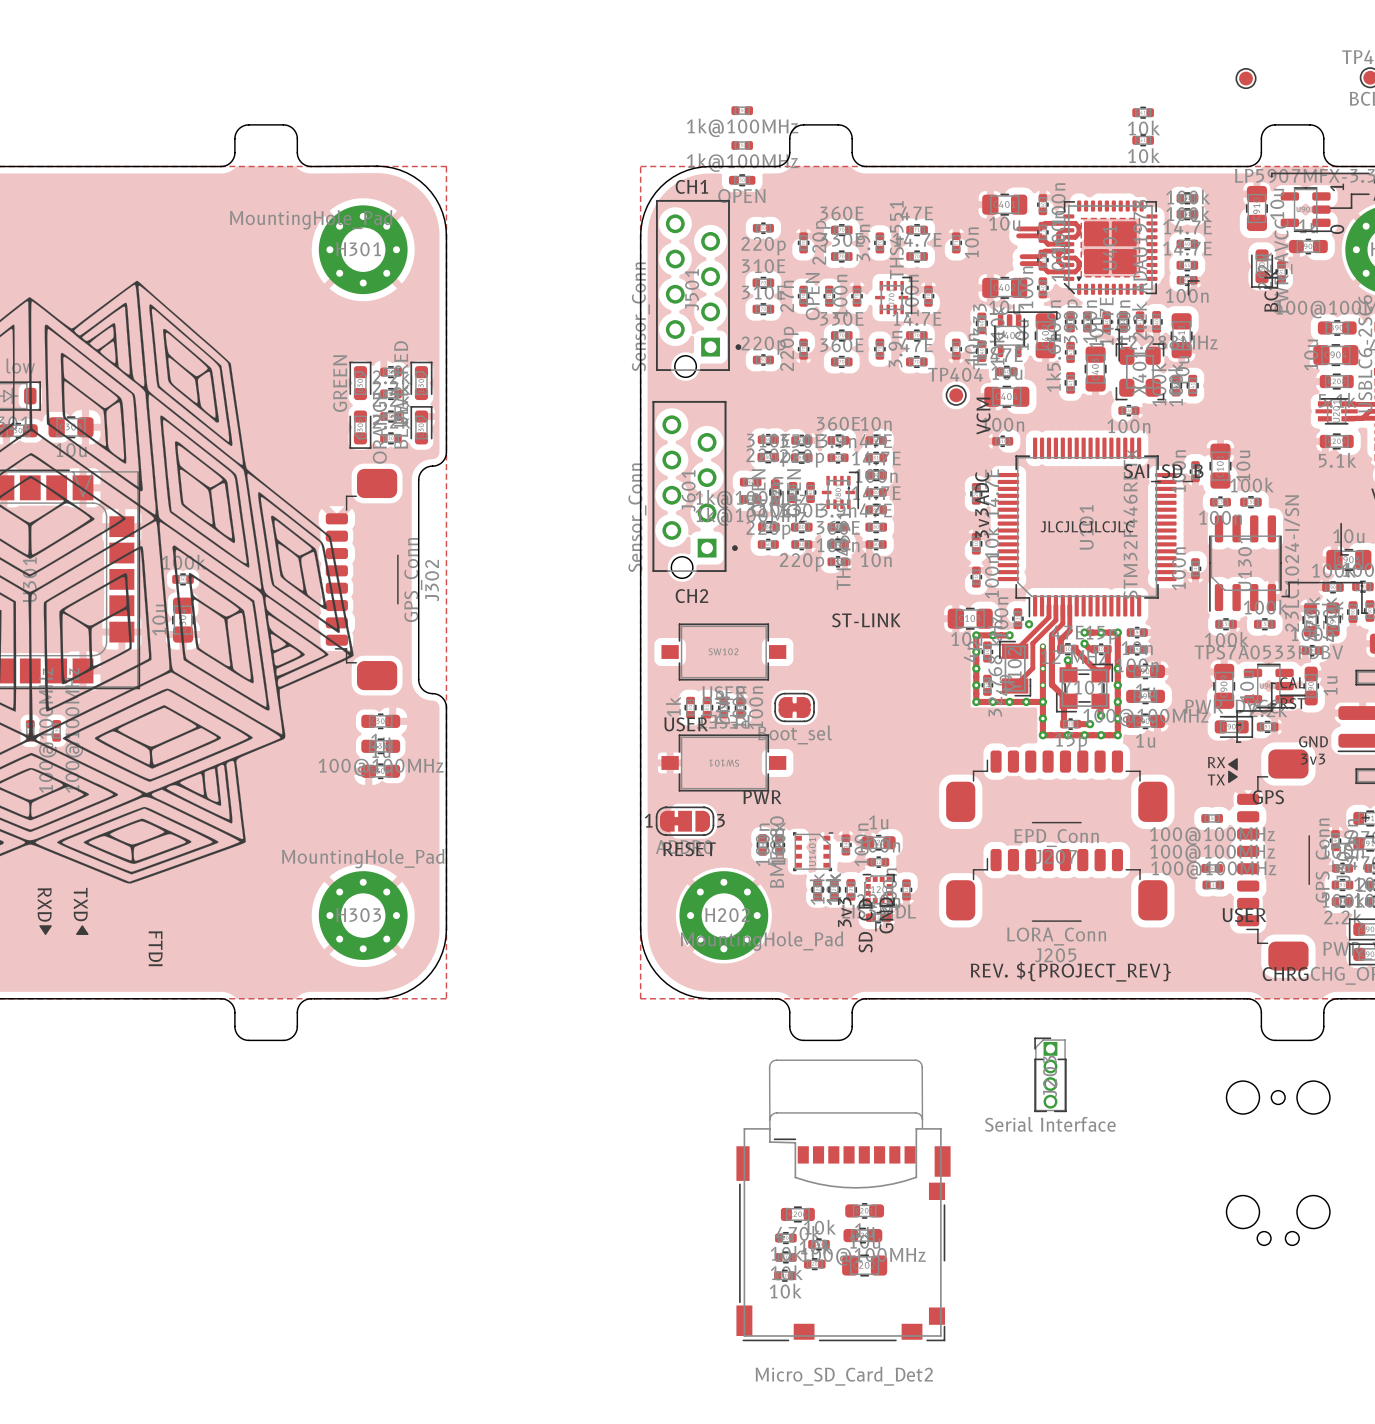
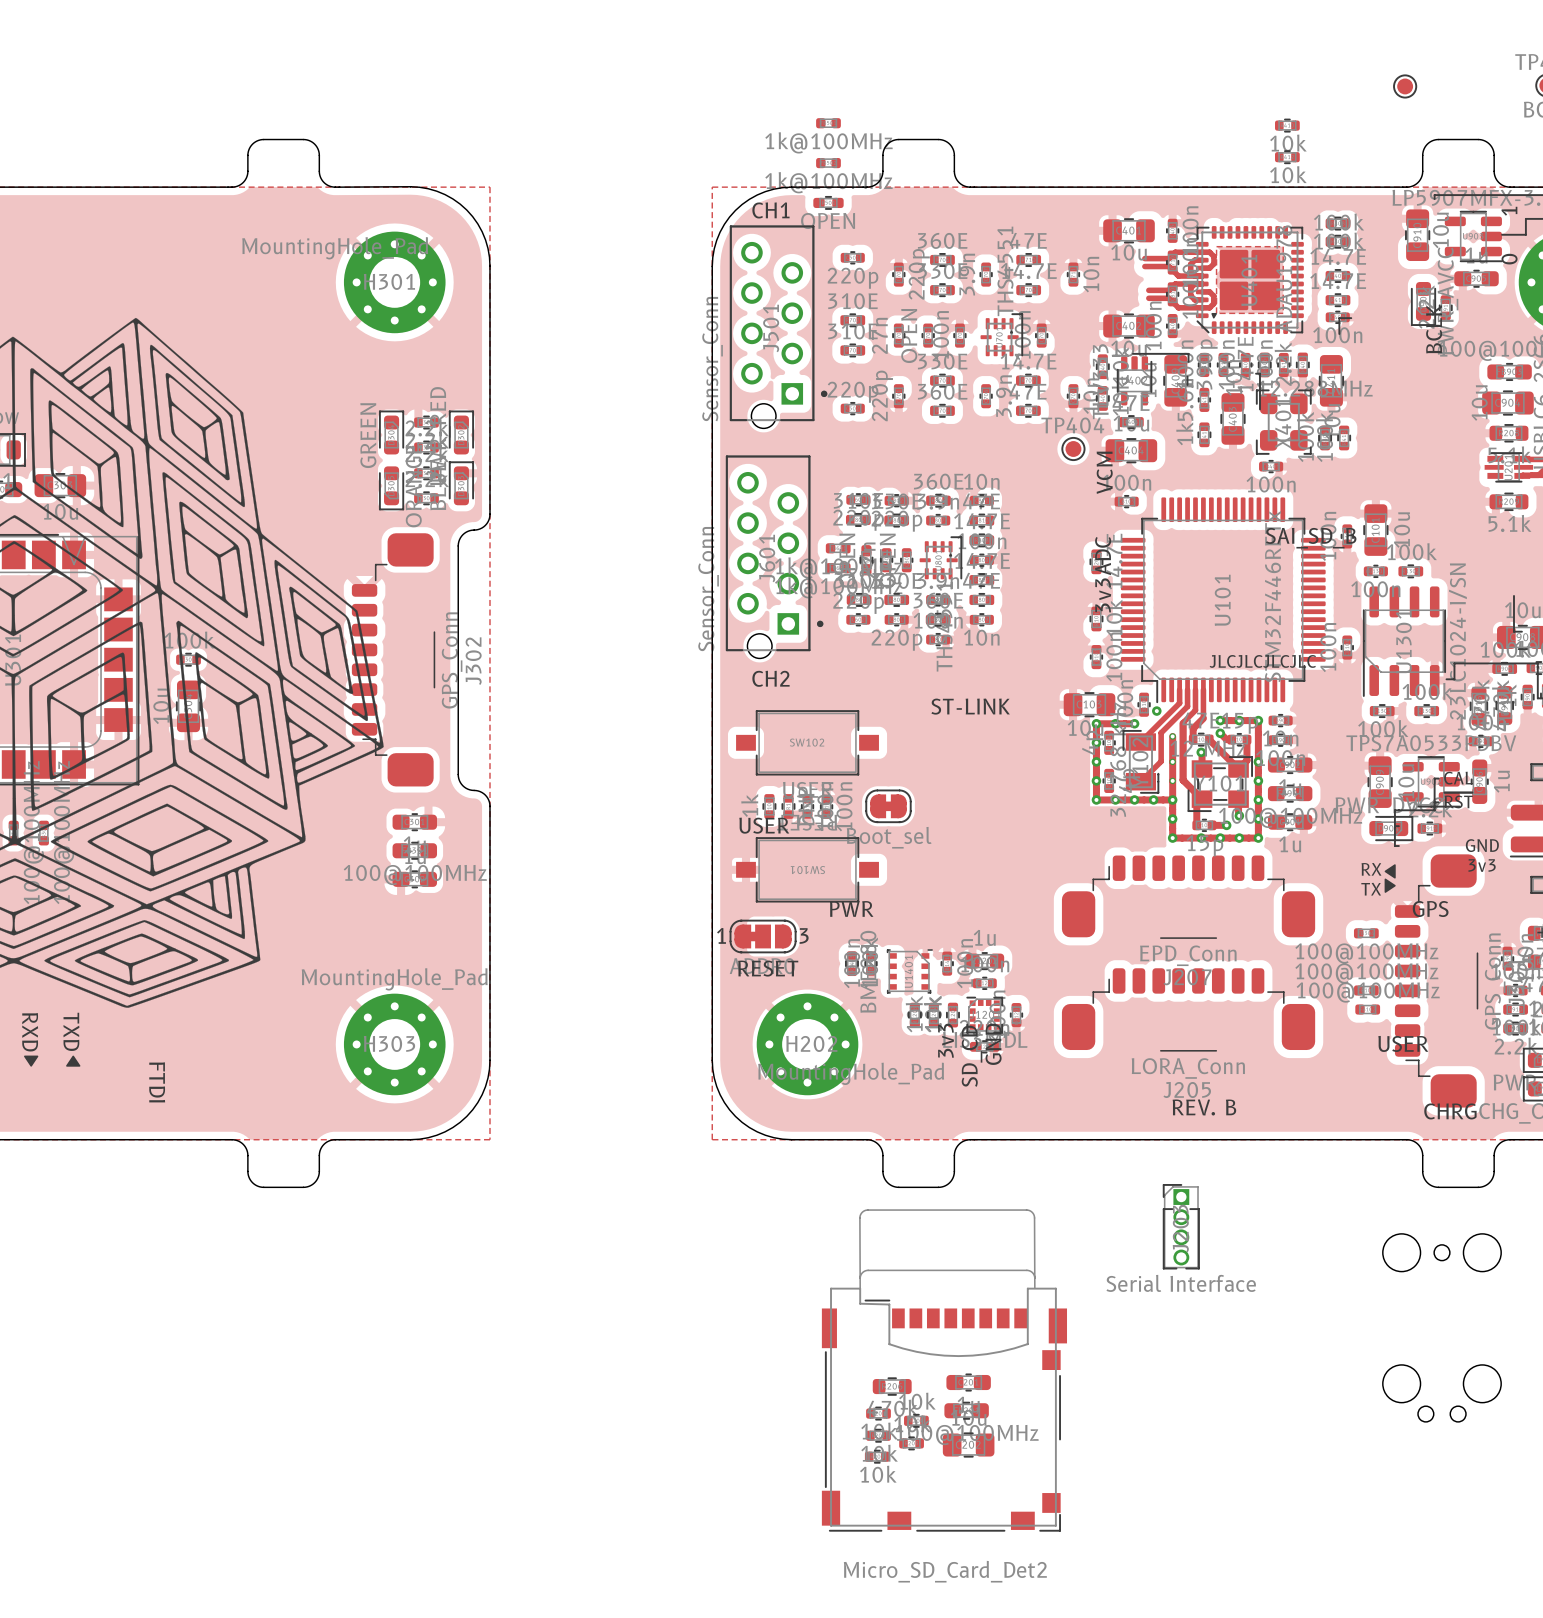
text position: JLCJLCJLCJLC (1087, 526) -> JLCJLCJLCJLC (1262, 661)
text: REV. ${PROJECT_REV} (1070, 971) -> REV. B (1204, 1107)

